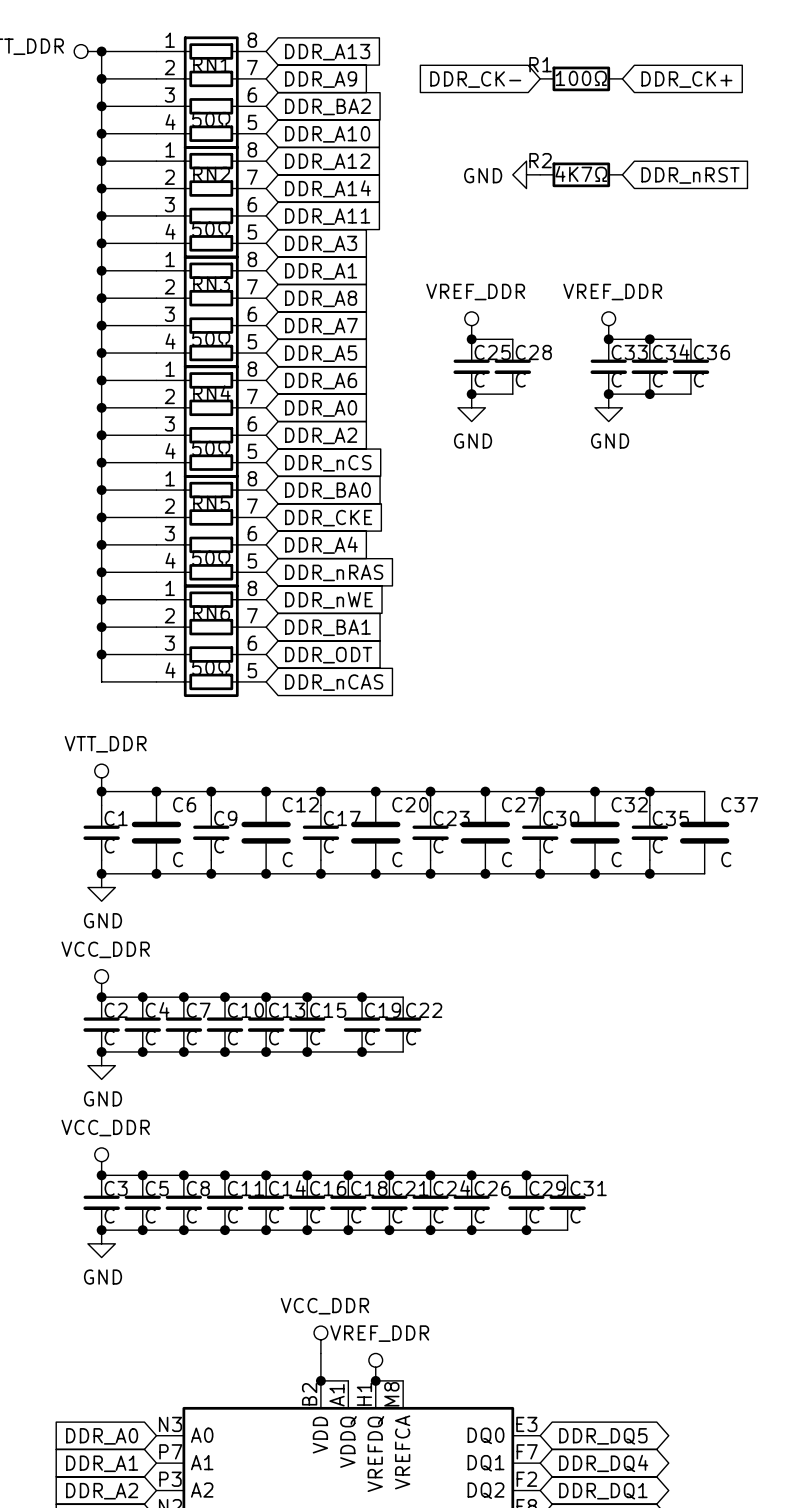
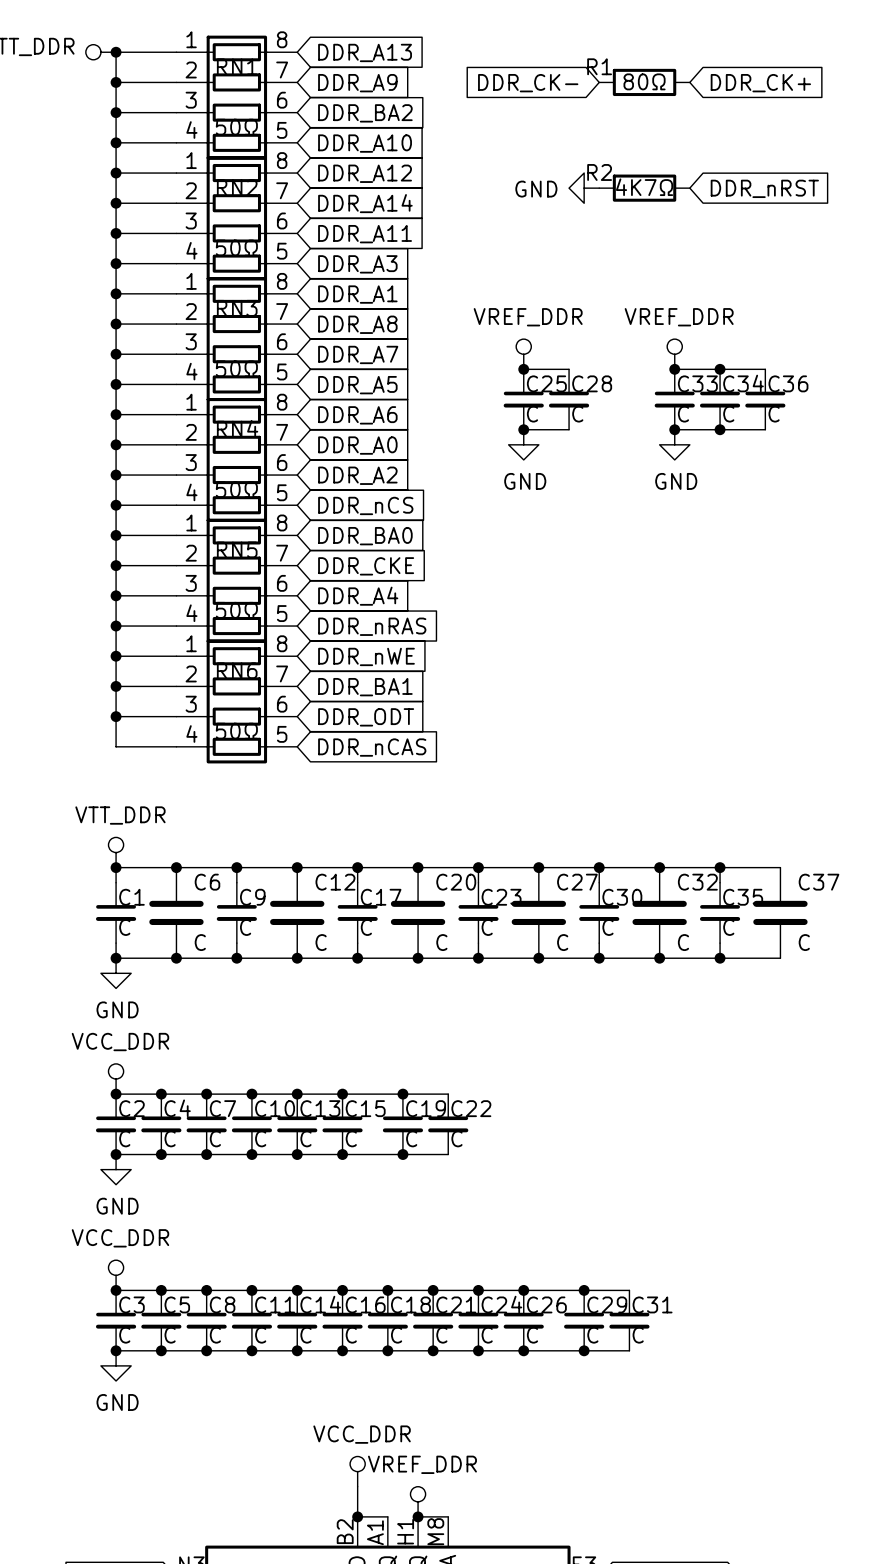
R1 value: 100Ω (581, 78) -> 80Ω (644, 81)

